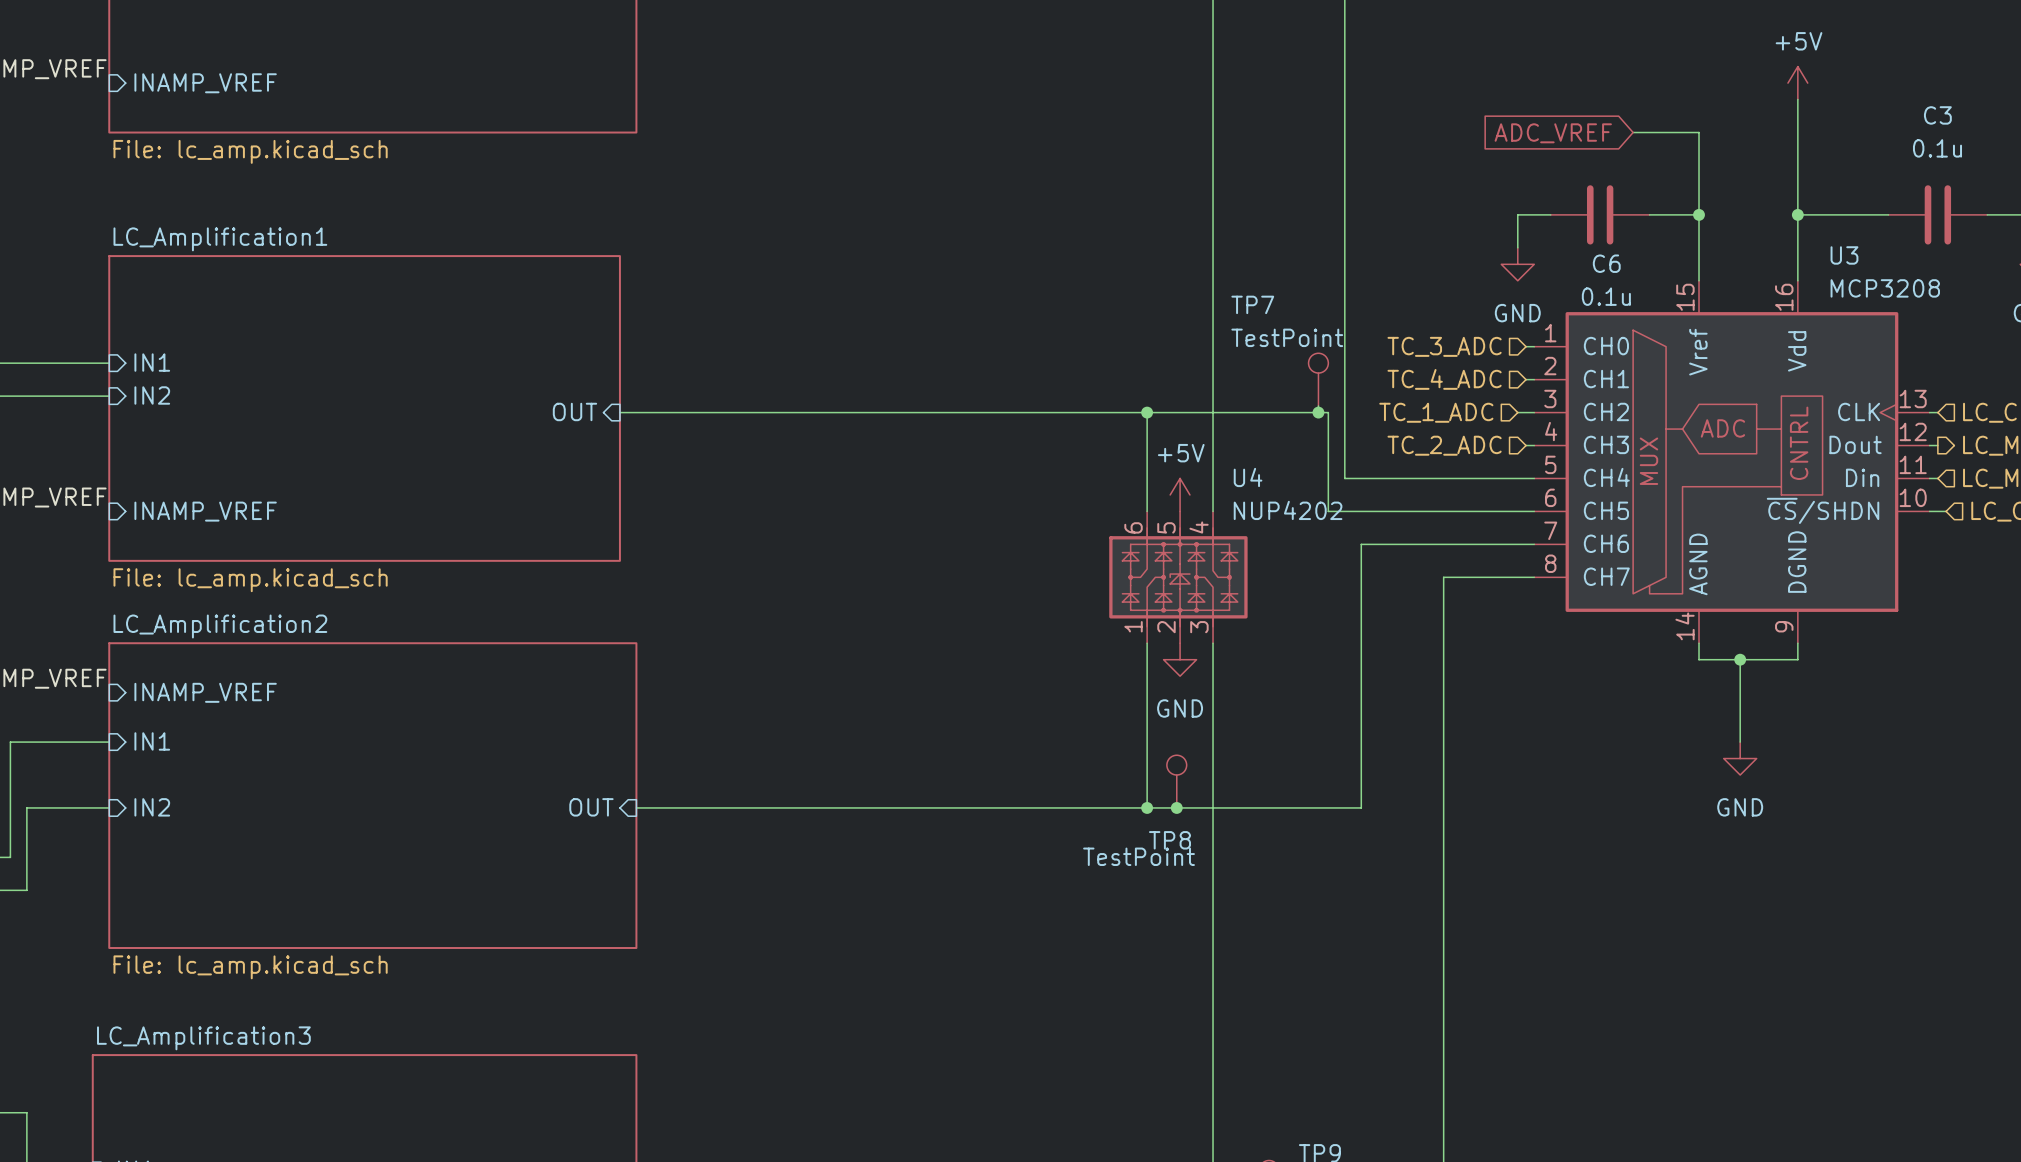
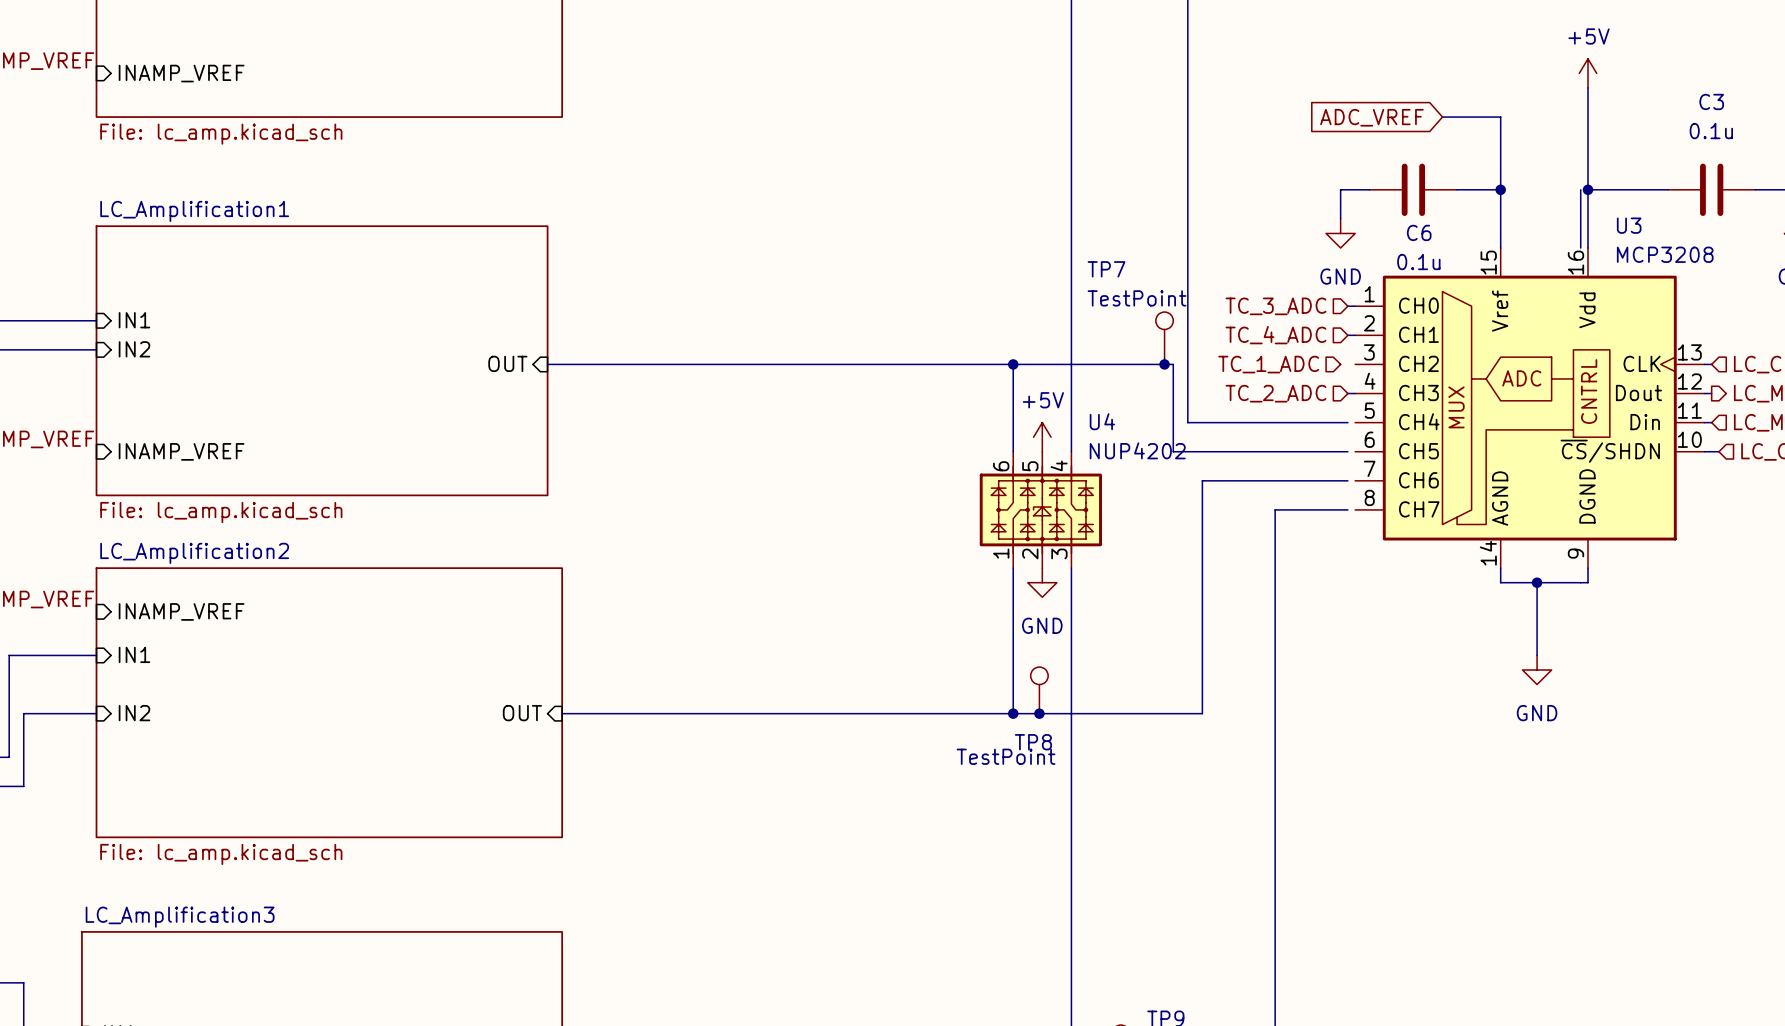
wire: none -> (1580, 189) (1580, 248)
wire: (1517, 412) (1534, 412) -> none
wire: (1526, 478) (1534, 478) -> none
wire: (1526, 511) (1534, 511) -> none
wire: (1526, 544) (1534, 544) -> none
wire: (1526, 577) (1534, 577) -> none

